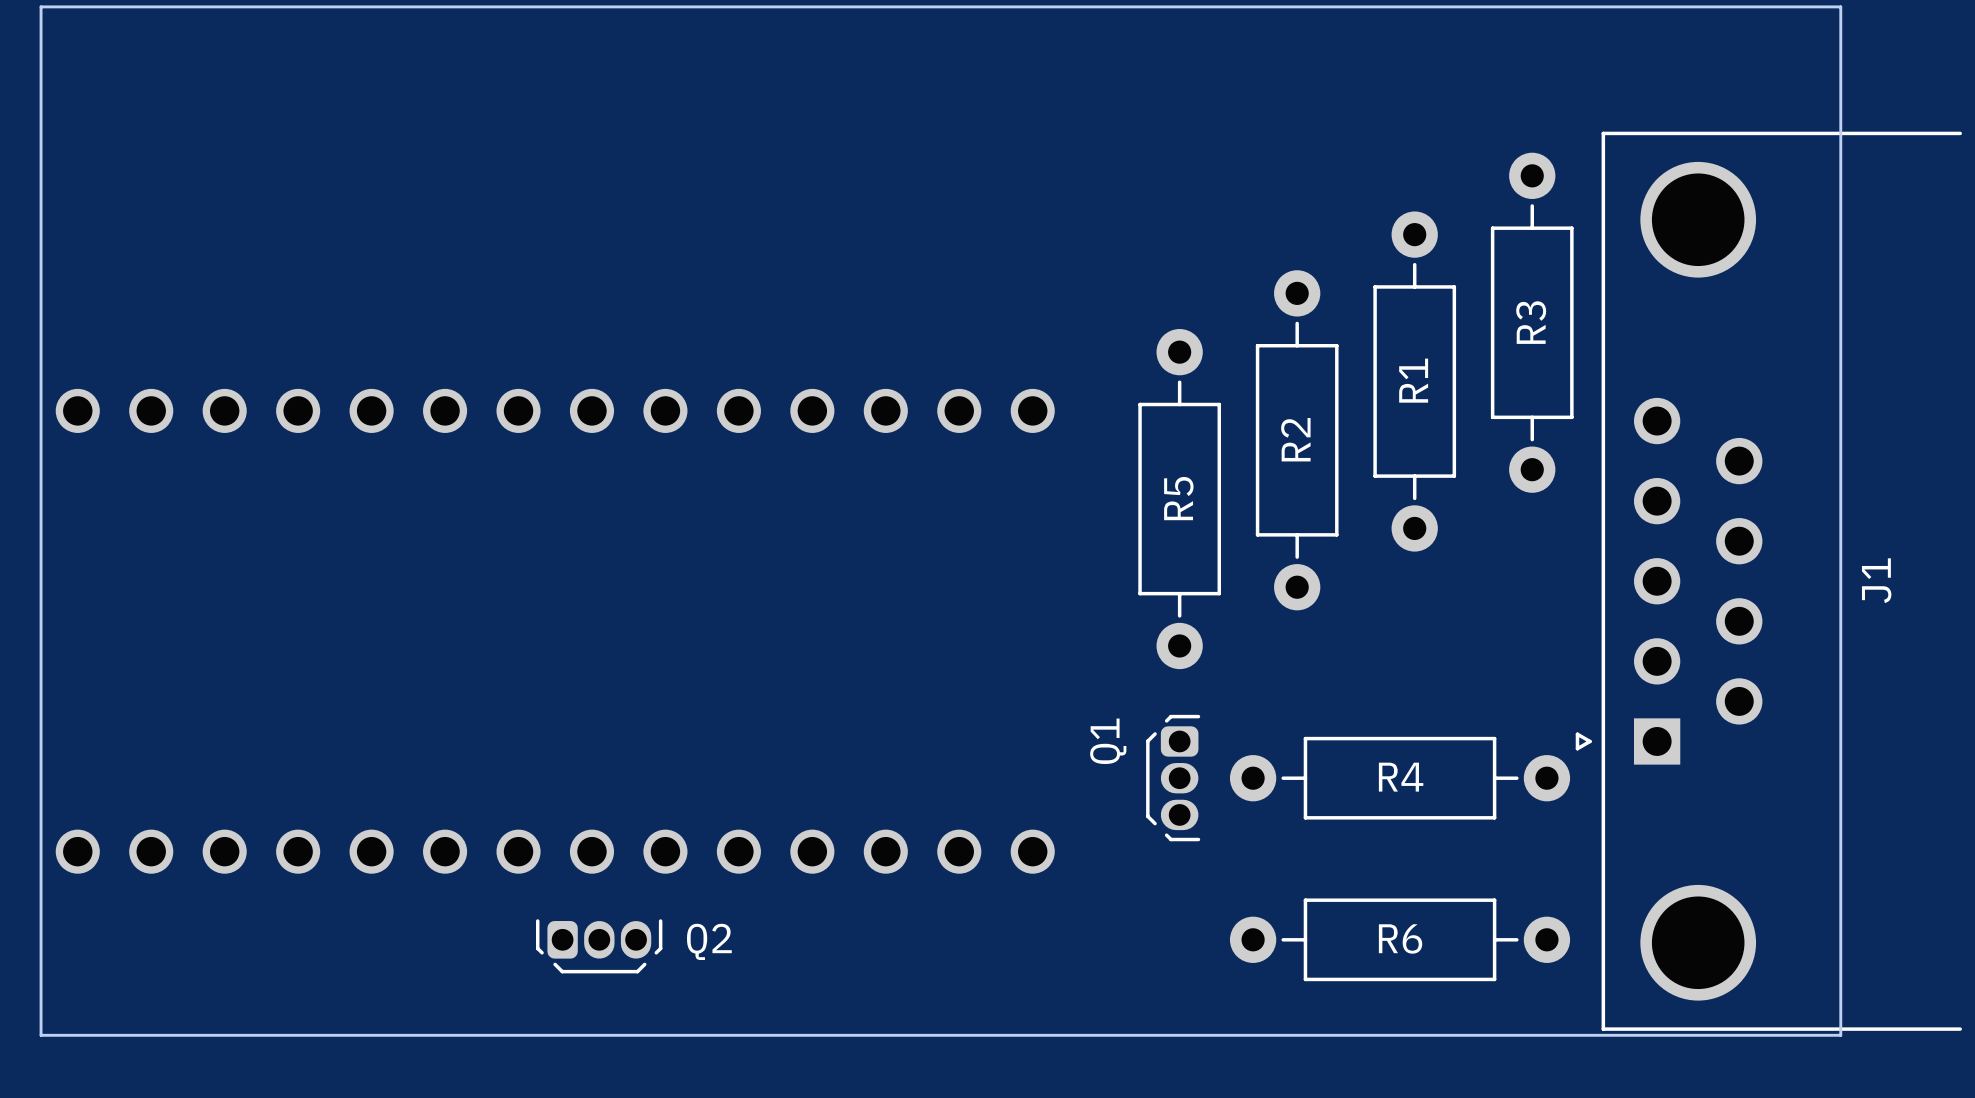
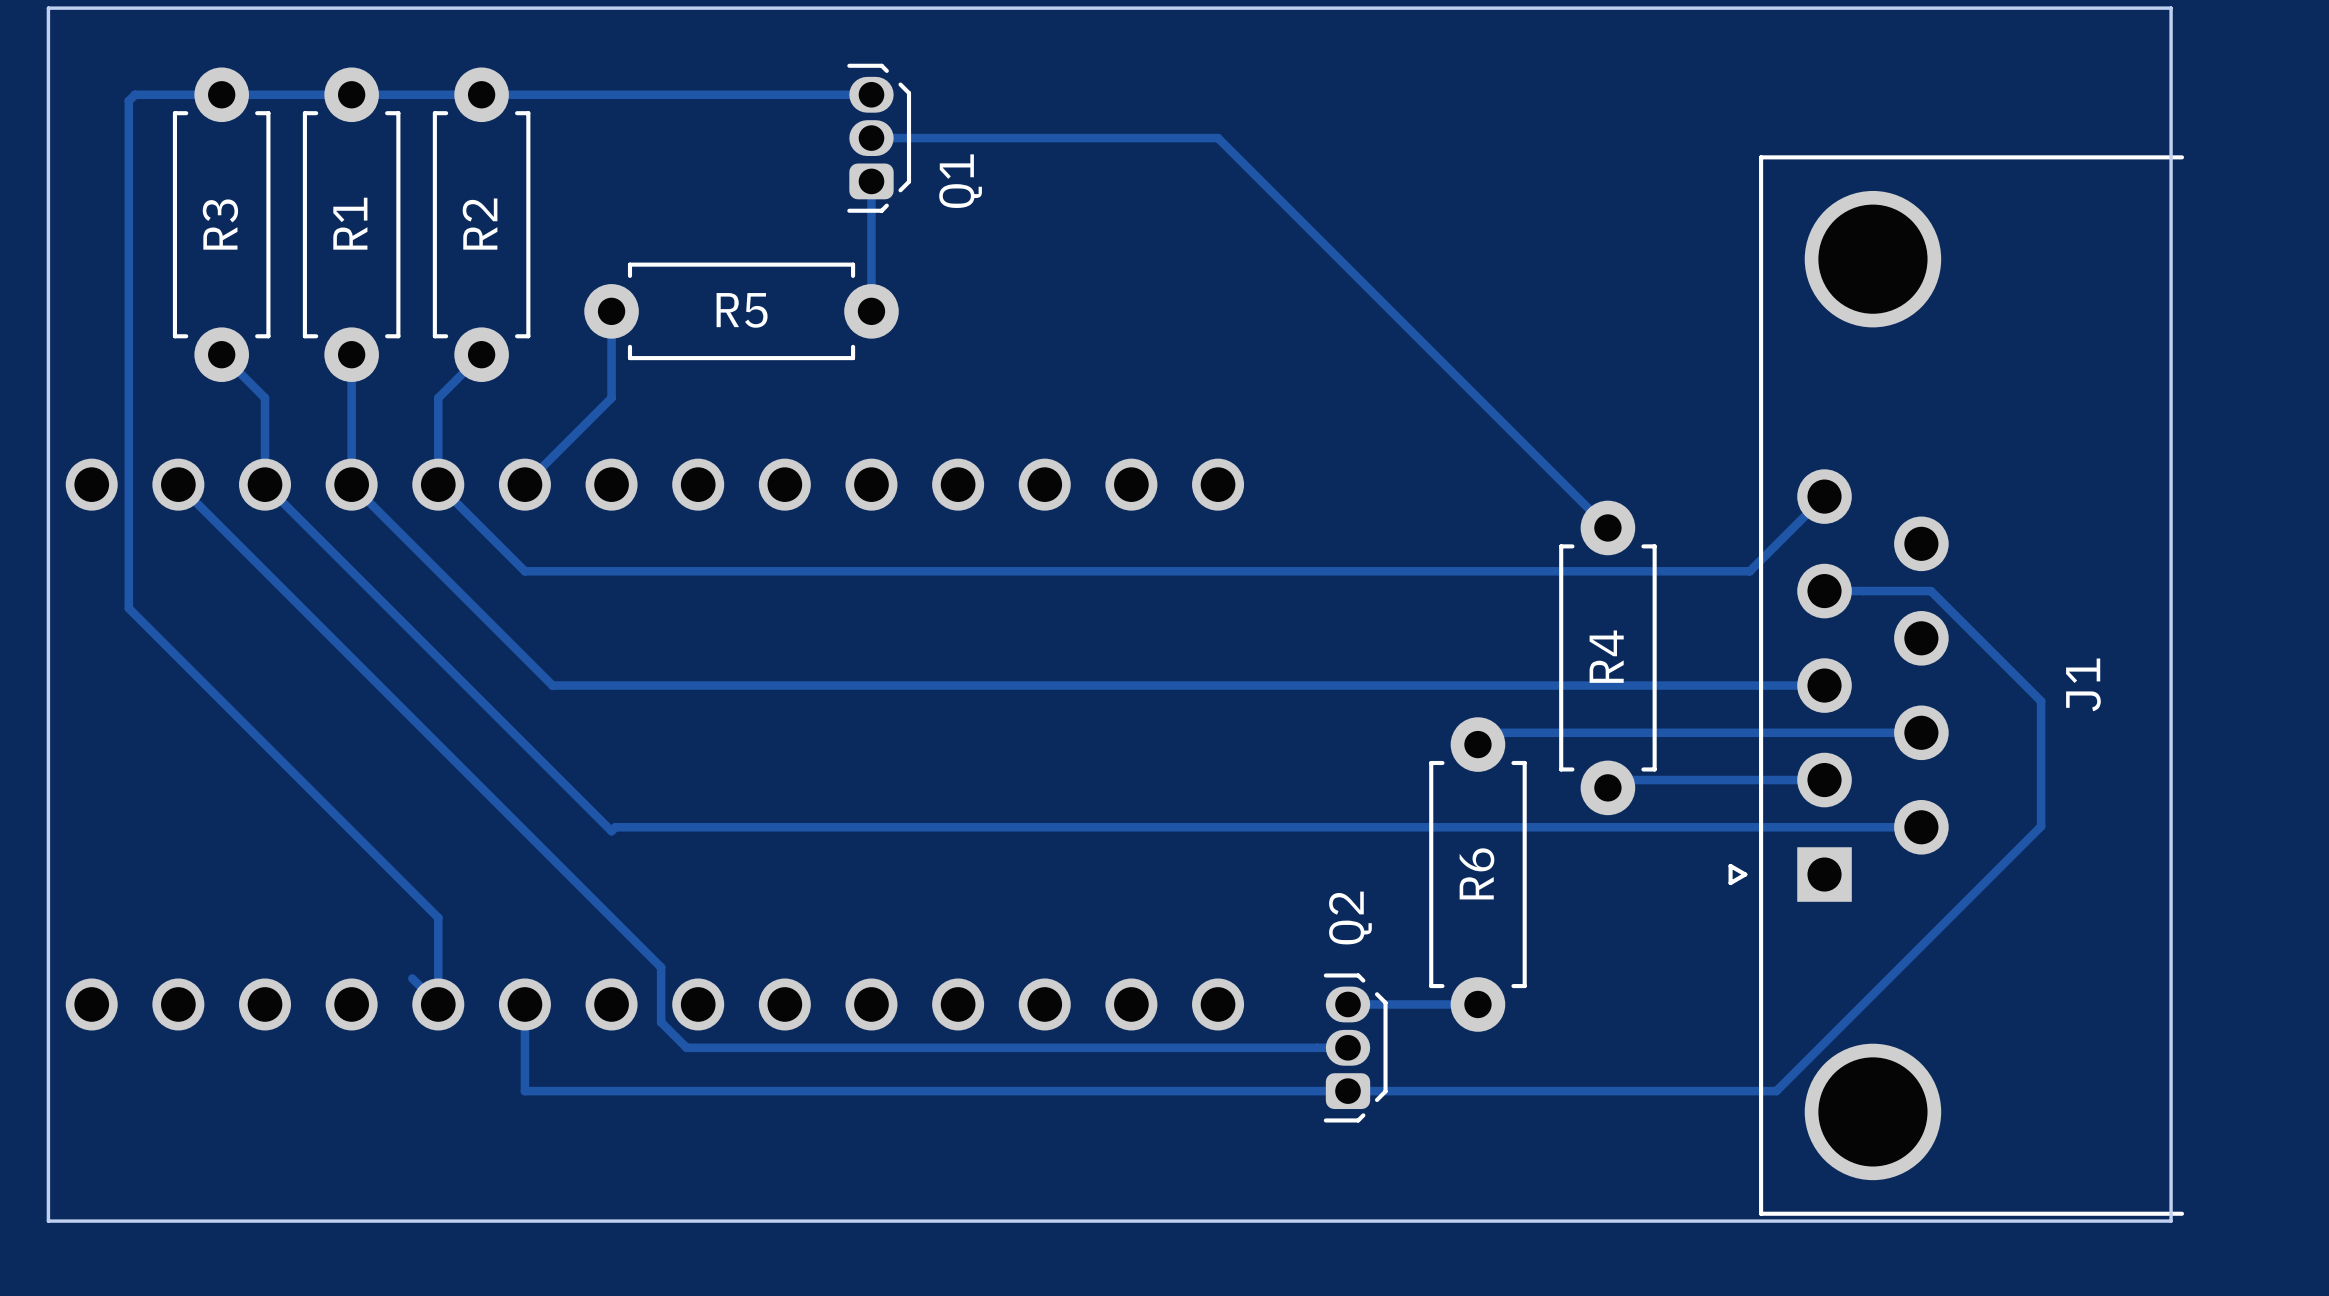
track: none -> (871, 94) (135, 94) (128, 101) (128, 608) (438, 917) (438, 1004) (412, 978)
track: none -> (871, 138) (1218, 138) (1607, 527)
R3 footprint: [1490, 152, 1574, 493] -> [172, 67, 271, 382]
track: none -> (871, 181) (871, 311)
R1 footprint: [1373, 211, 1457, 552] -> [302, 67, 401, 382]
track: none -> (611, 311) (611, 398) (524, 484)
R2 footprint: [1255, 270, 1339, 611] -> [432, 67, 531, 382]
track: none -> (221, 354) (265, 398) (265, 484) (611, 831) (615, 827) (1921, 827)
track: none -> (351, 354) (351, 484) (552, 685) (1824, 685)
track: none -> (481, 354) (438, 398) (438, 484) (524, 571) (1749, 571) (1824, 496)
R5 footprint: [1138, 329, 1222, 670] -> [584, 262, 899, 361]
track: none -> (178, 484) (661, 967) (661, 1022) (686, 1047) (1348, 1047)
track: none -> (1824, 591) (1930, 591) (2041, 701) (2041, 826) (1776, 1091) (524, 1091) (524, 1004)
J1 position: (1768, 581) -> (1956, 685)
track: none -> (1921, 732) (1489, 732) (1477, 744)
track: none -> (1824, 780) (1615, 780) (1607, 787)
R4 footprint: [1229, 736, 1571, 820] -> [1559, 500, 1657, 816]
Q1 rotation: 0° (1173, 778) -> 180° (879, 138)
Q1 position: (1173, 778) -> (879, 138)
track: none -> (1348, 1004) (1477, 1004)
R6 footprint: [1229, 898, 1571, 982] -> [1429, 717, 1527, 1032]
Q2 rotation: 0° (599, 946) -> 90° counterclockwise (1355, 1047)
Q2 position: (599, 946) -> (1355, 1047)

